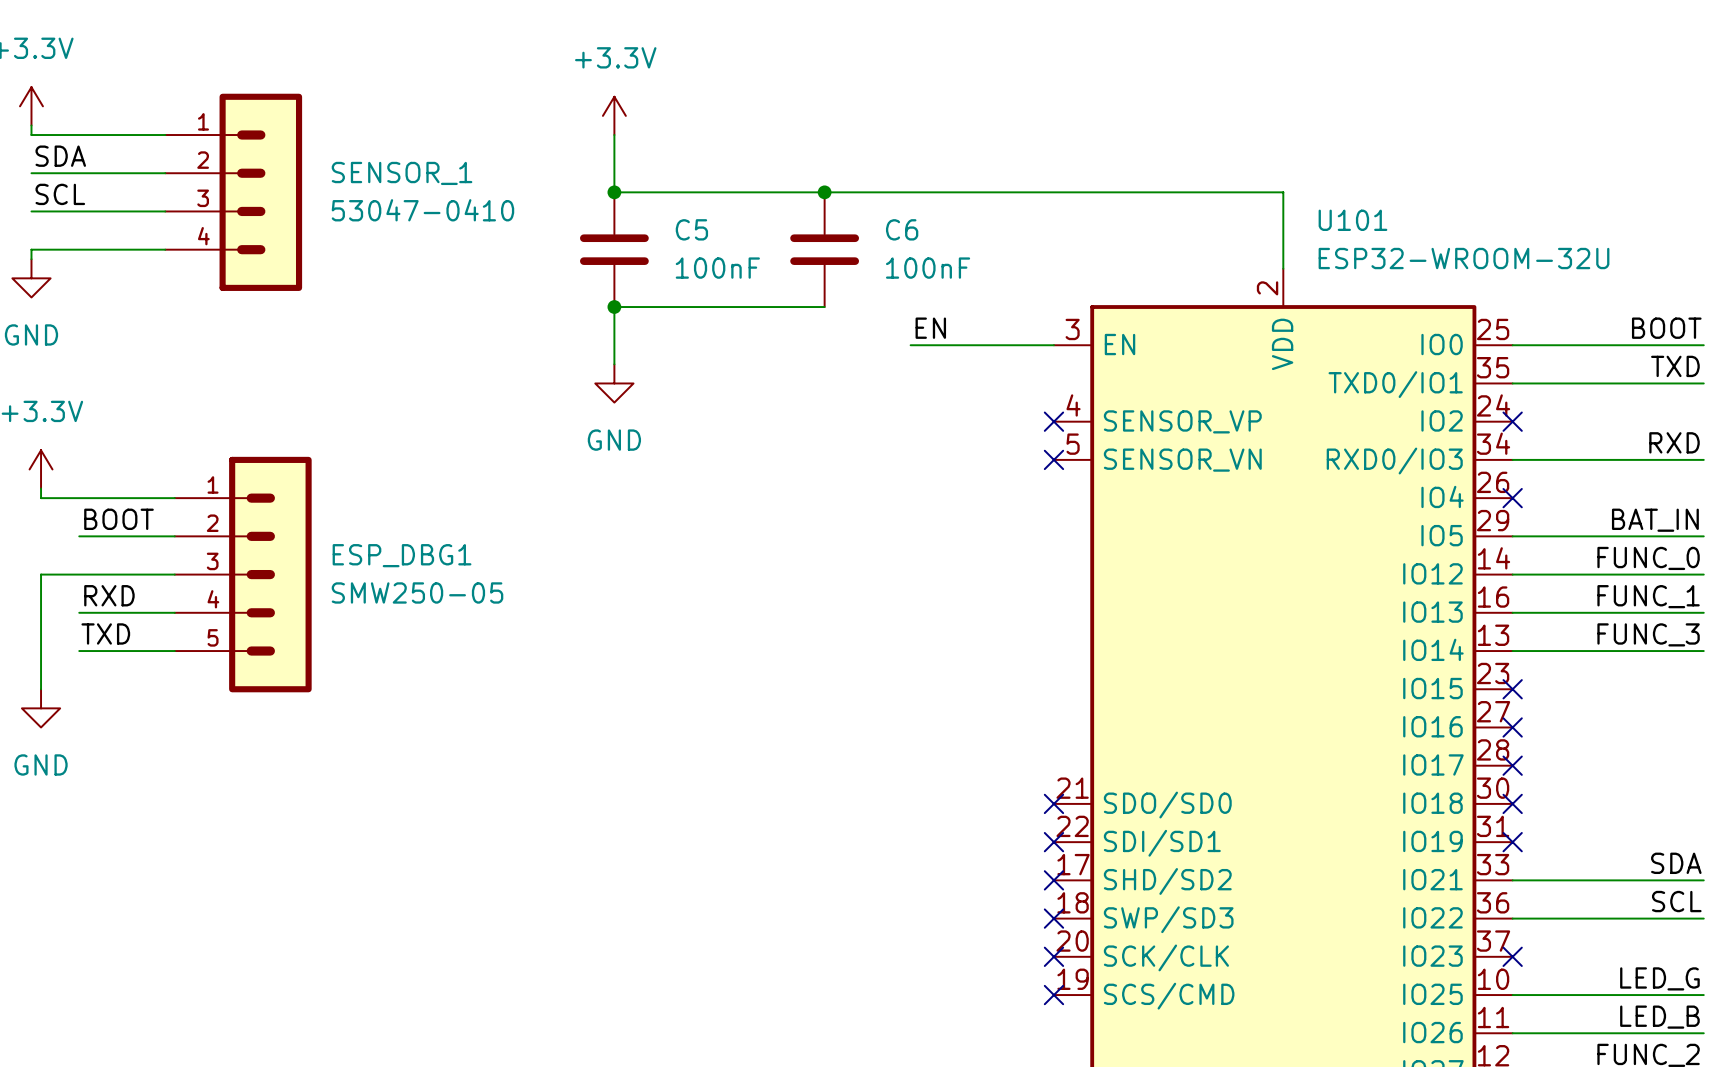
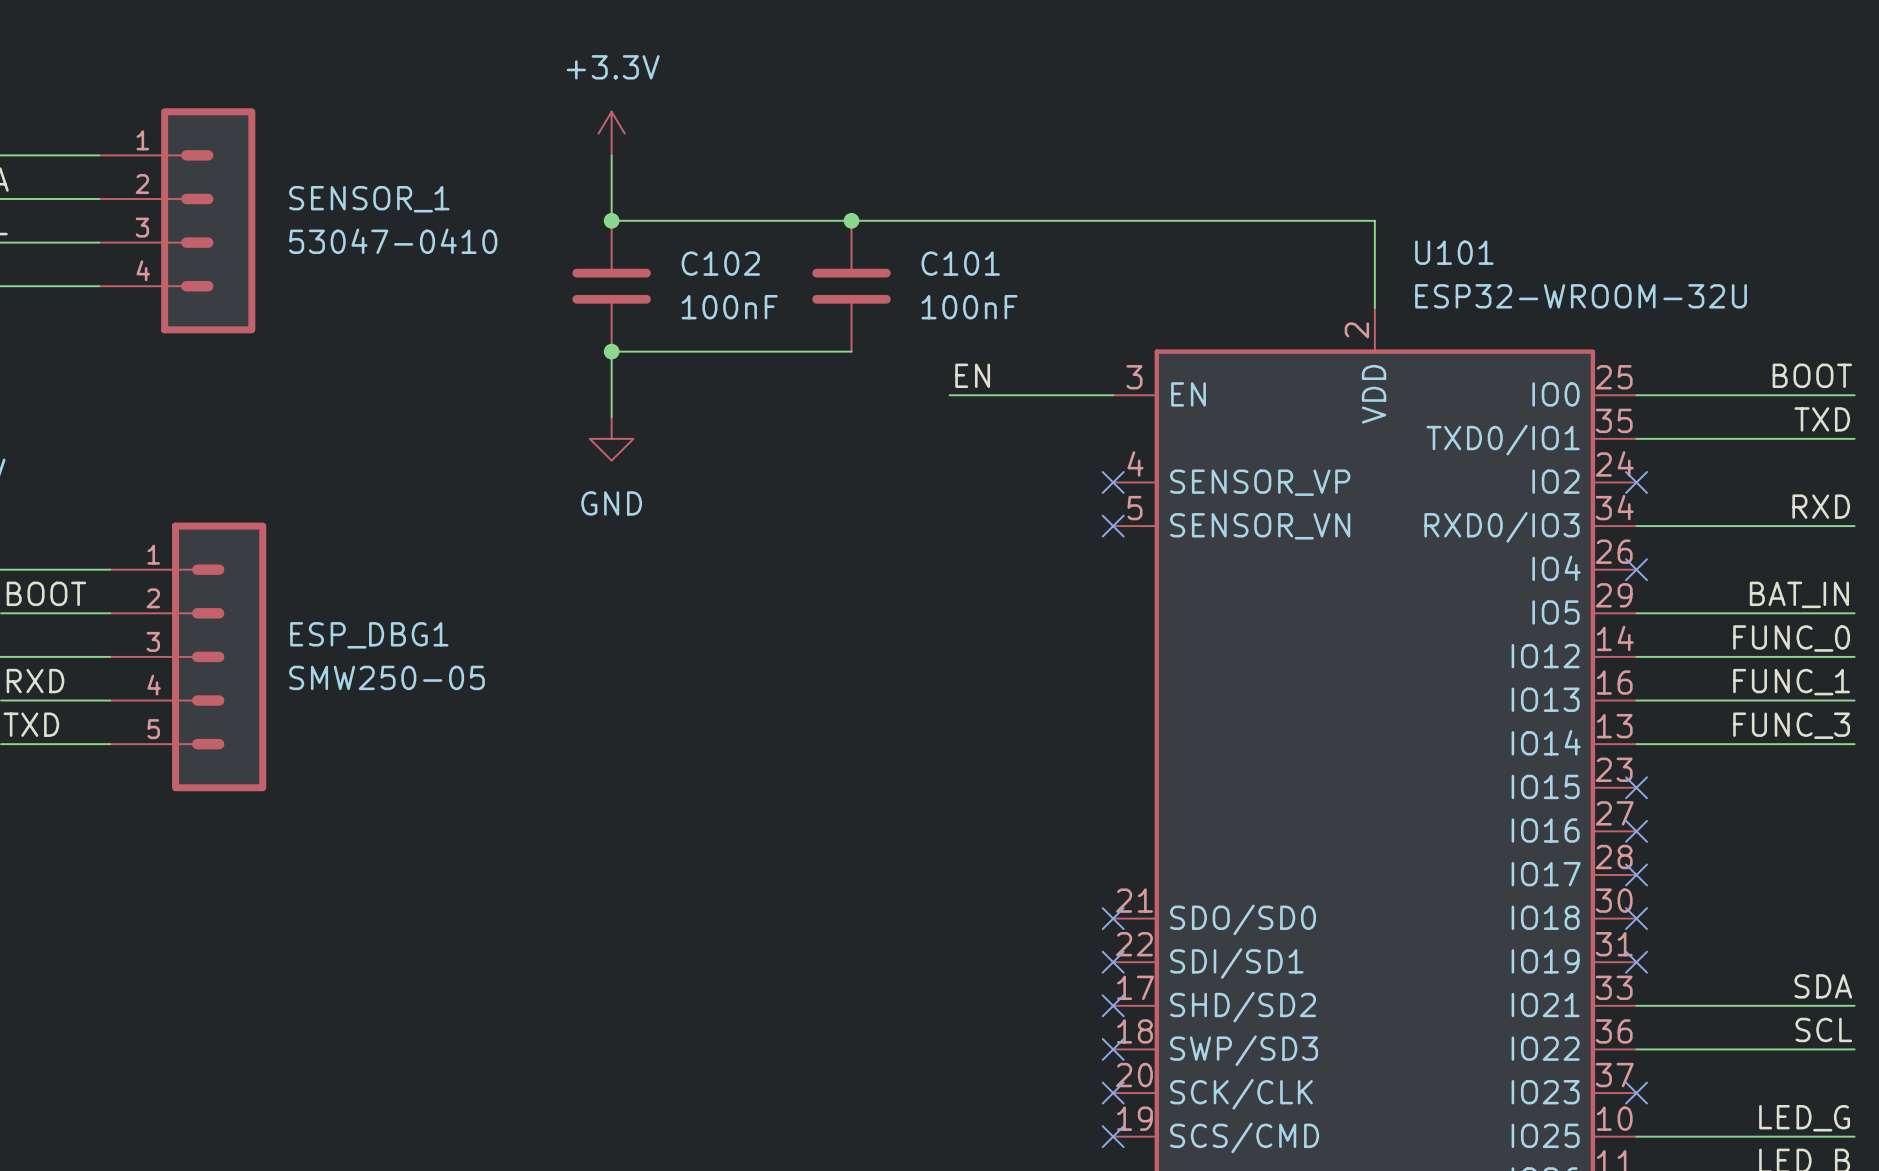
C5 name: C5 (691, 229) -> C102 (720, 263)
C6 name: C6 (902, 229) -> C101 (960, 263)

